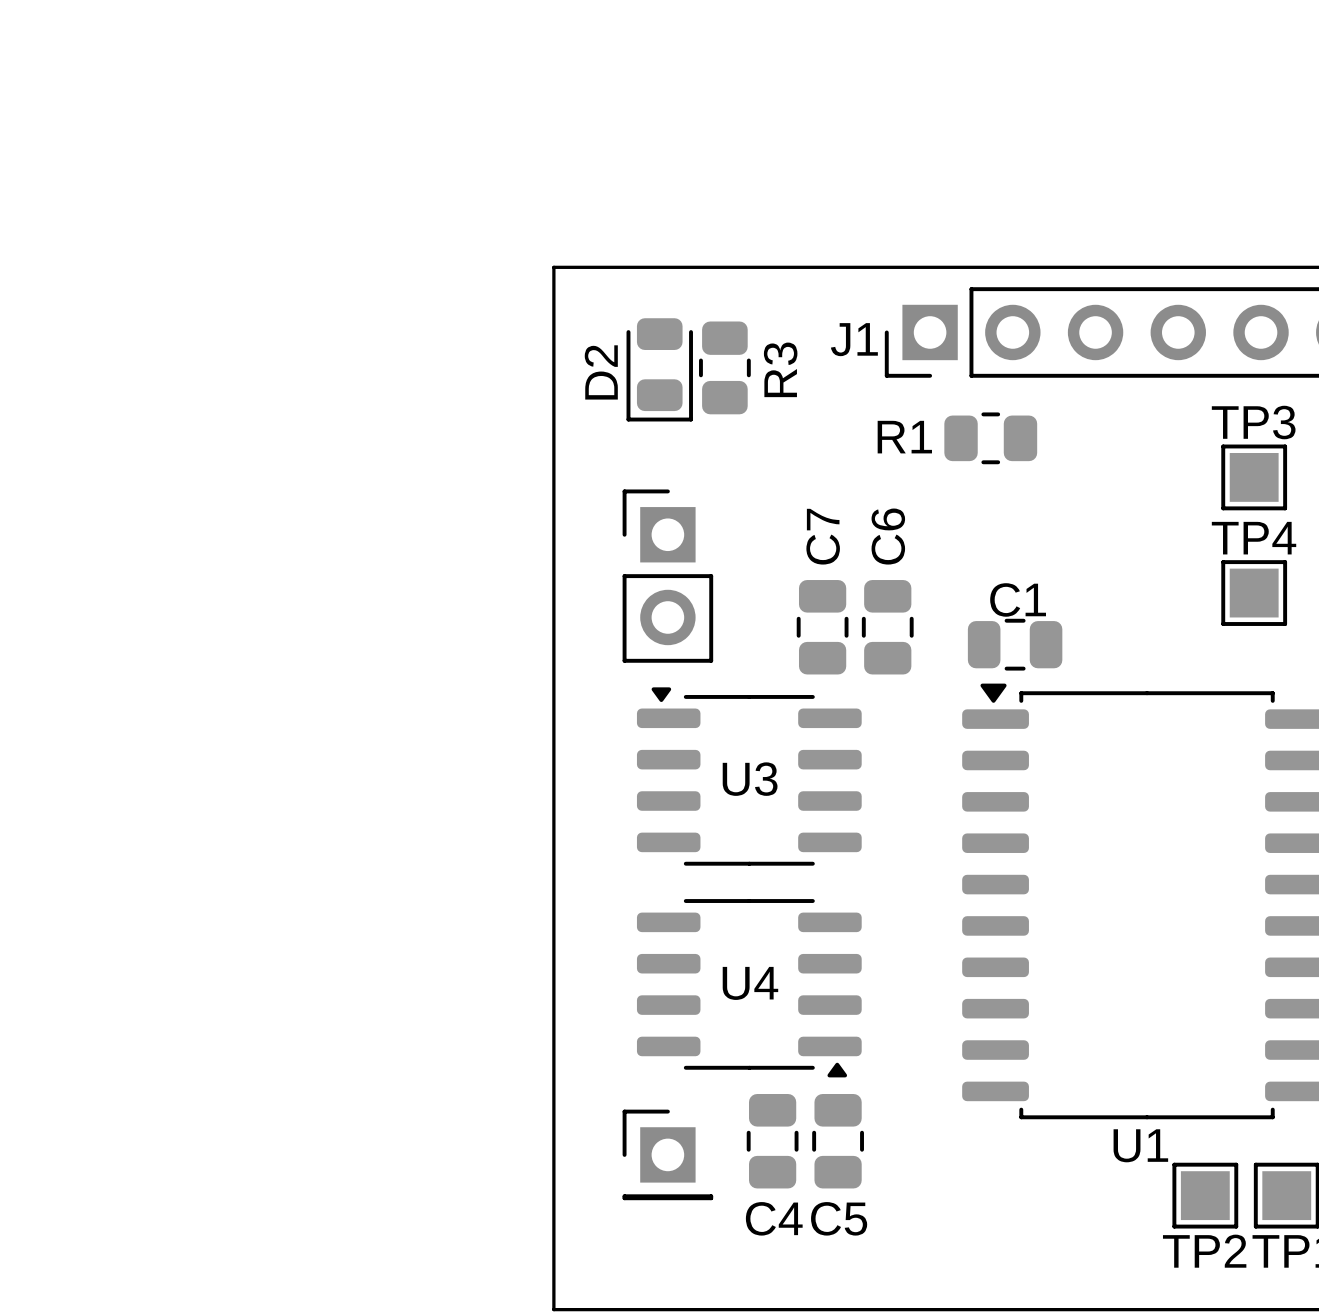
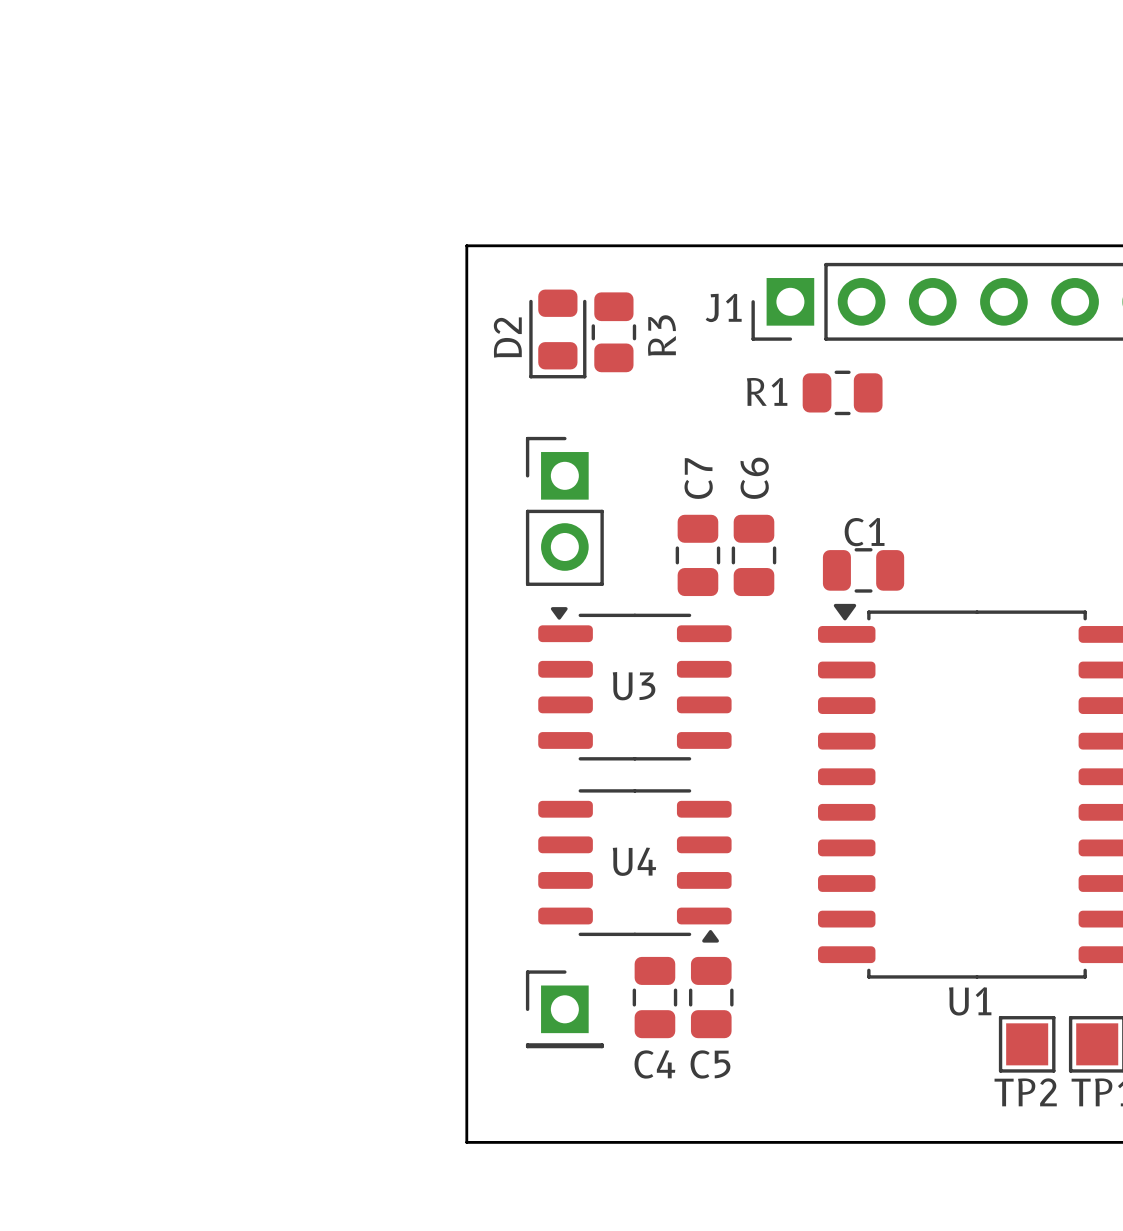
TP3: (1254, 477) -> none
TP4: (1254, 593) -> none

